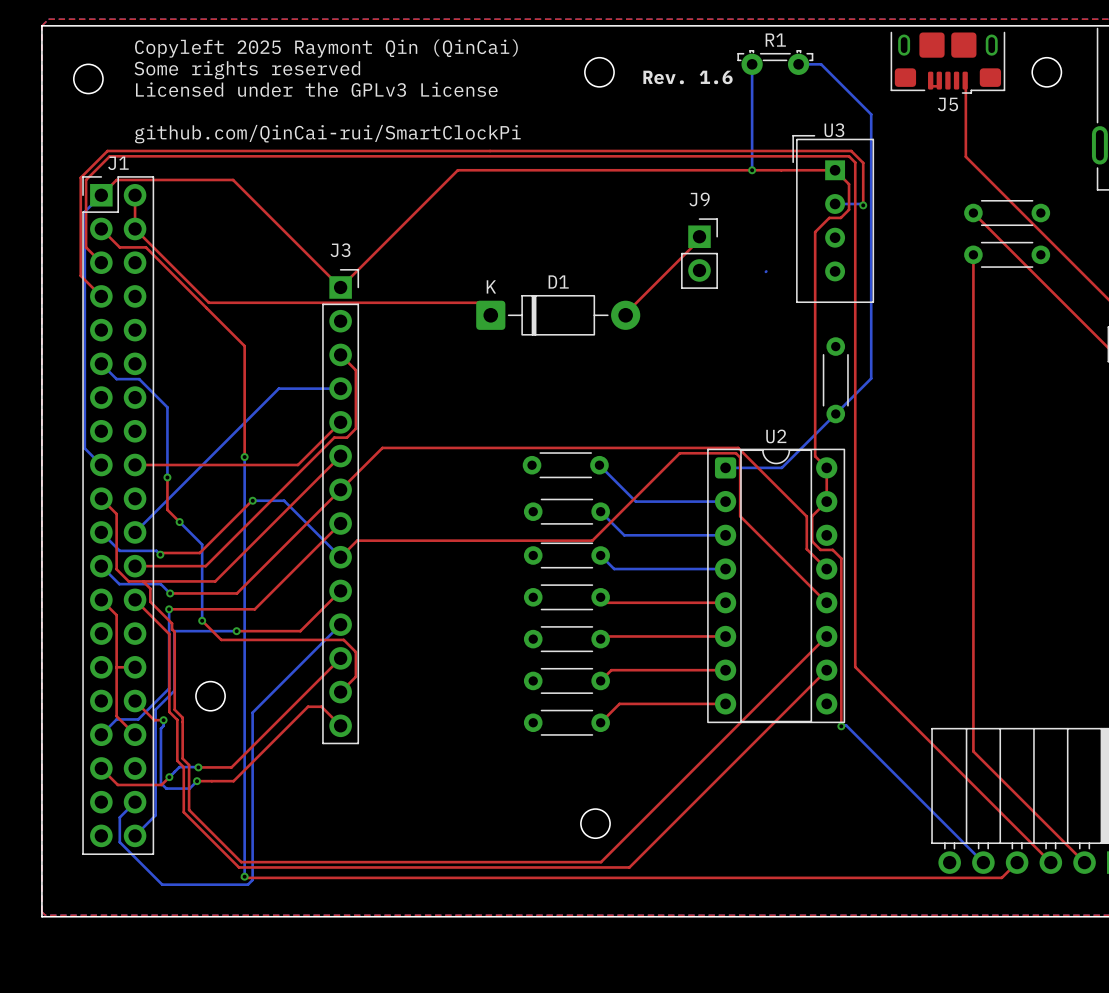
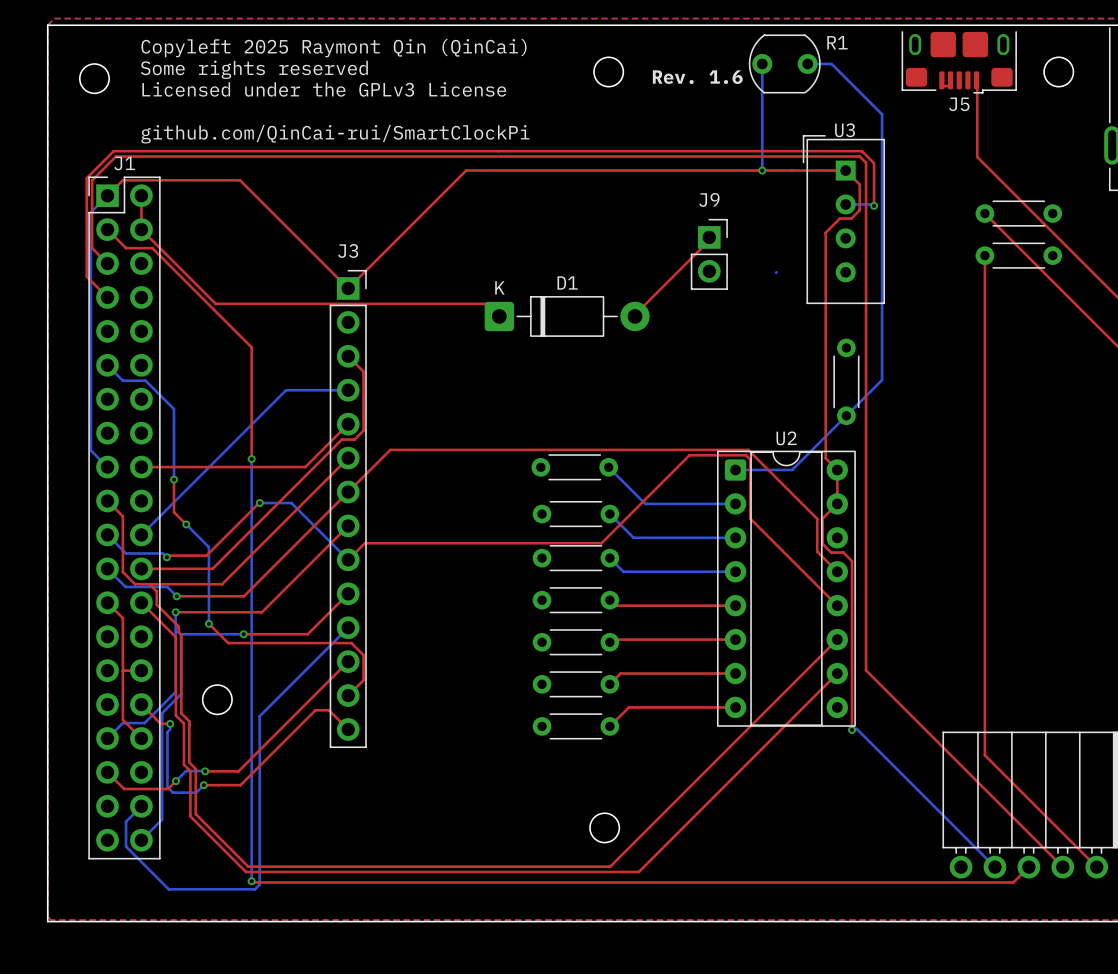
R1 name position: R1 (775, 40) -> R1 (837, 42)
R1 footprint: [737, 50, 814, 75] -> [748, 34, 821, 94]

